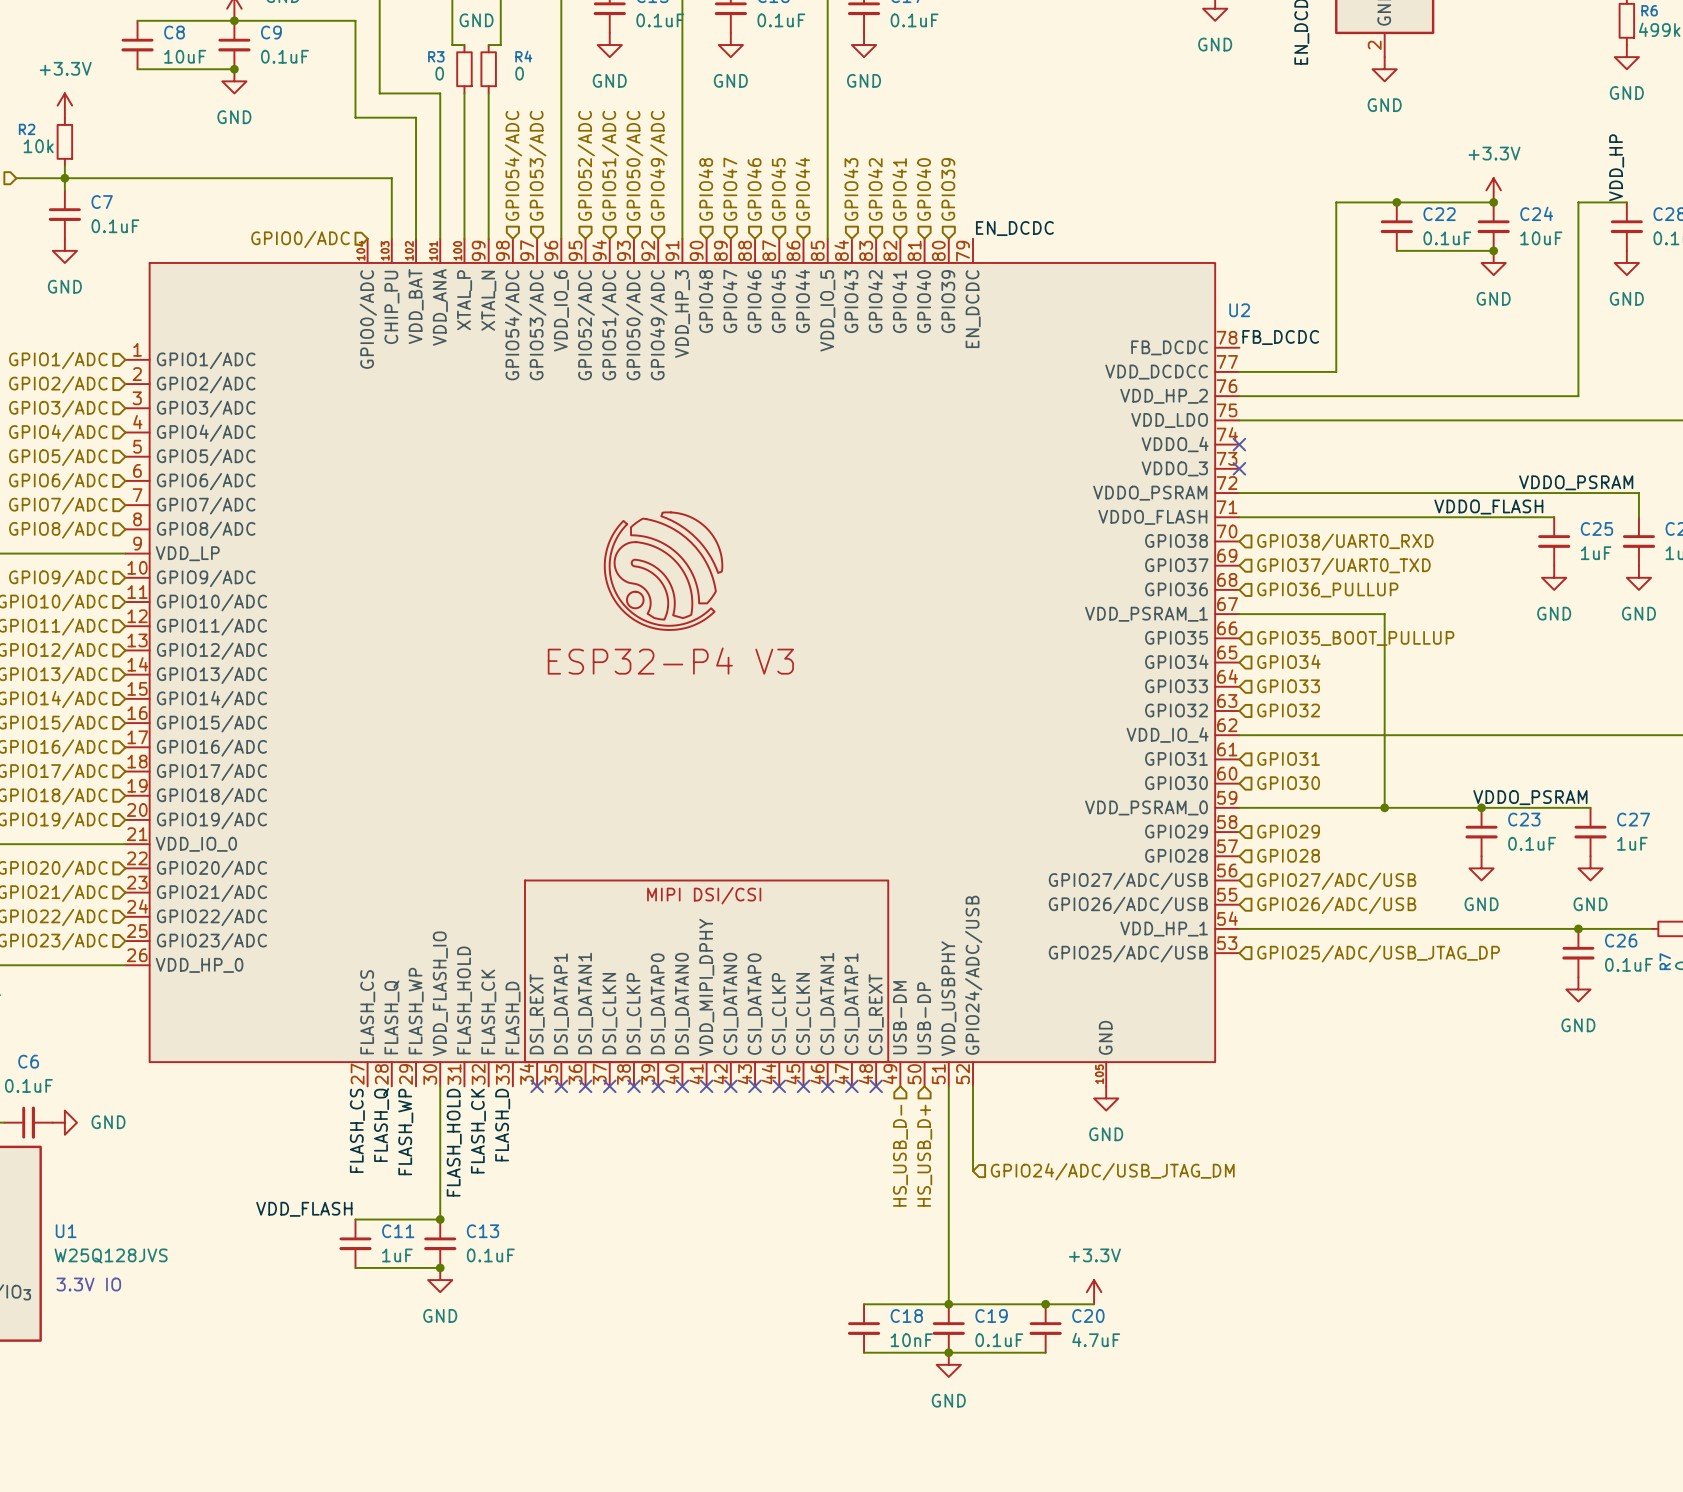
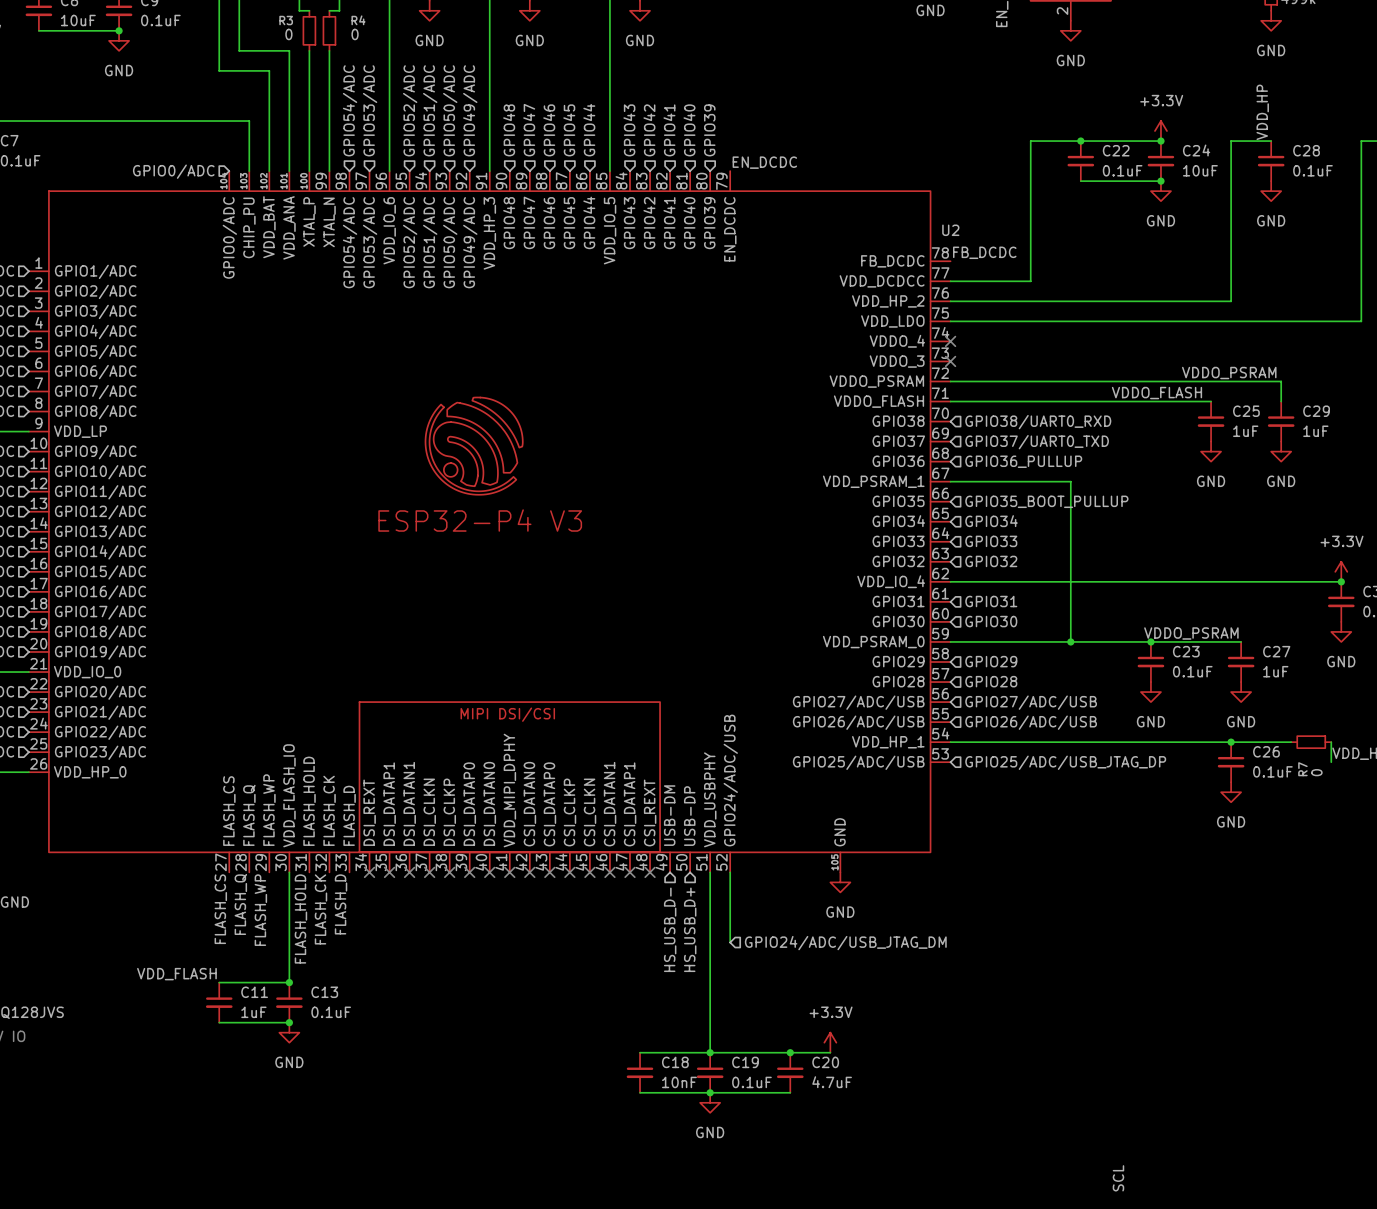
label: none -> SCL (1118, 1178)

